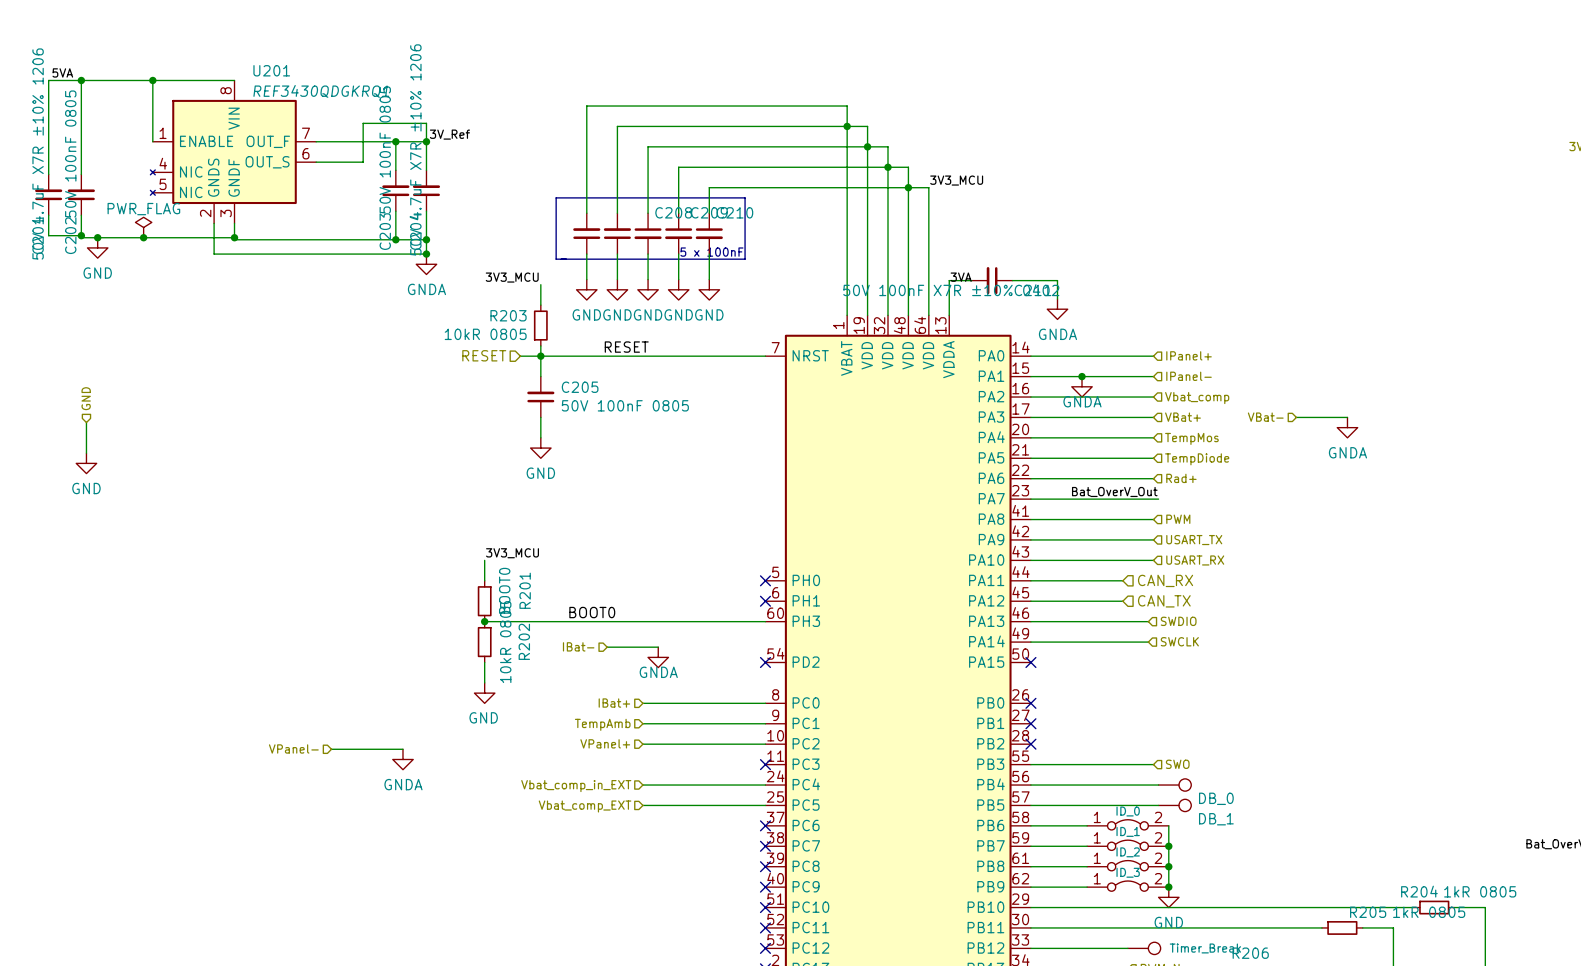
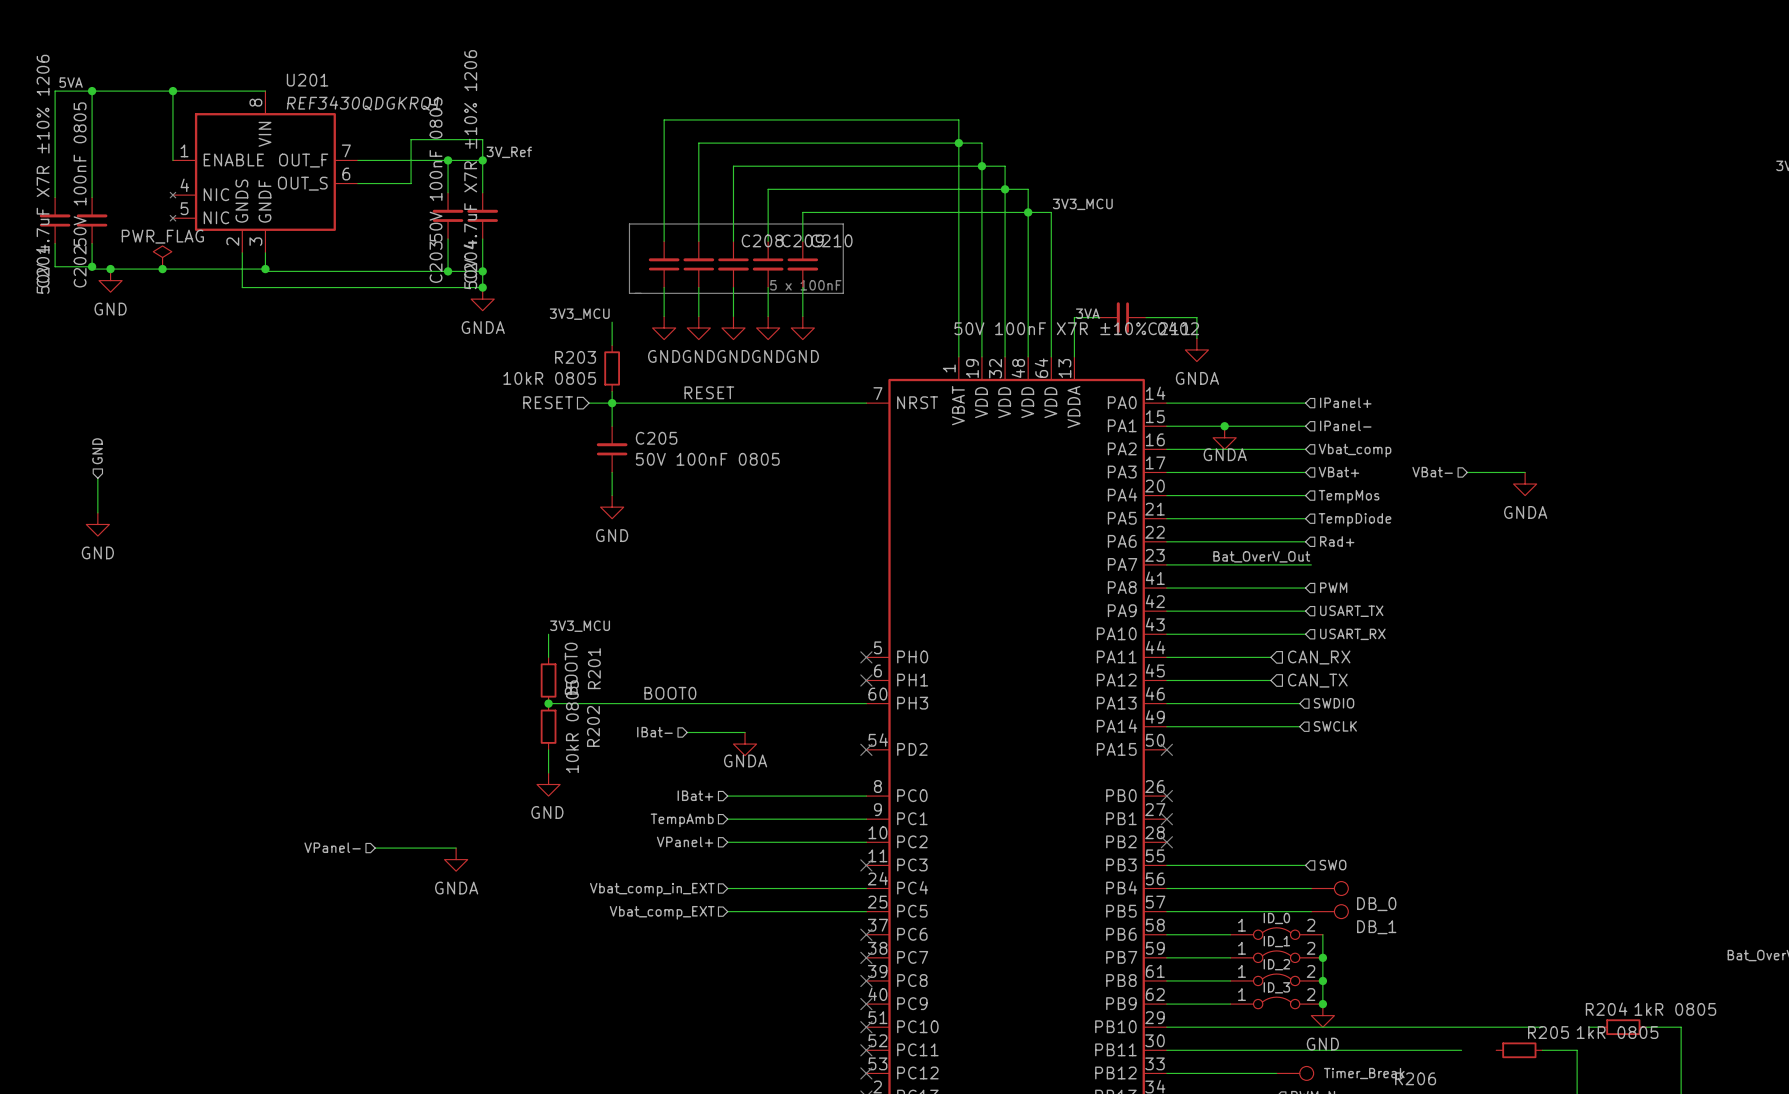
wire: (1362, 907) (1403, 907) -> none
wire: (1291, 927) (1321, 927) -> none

